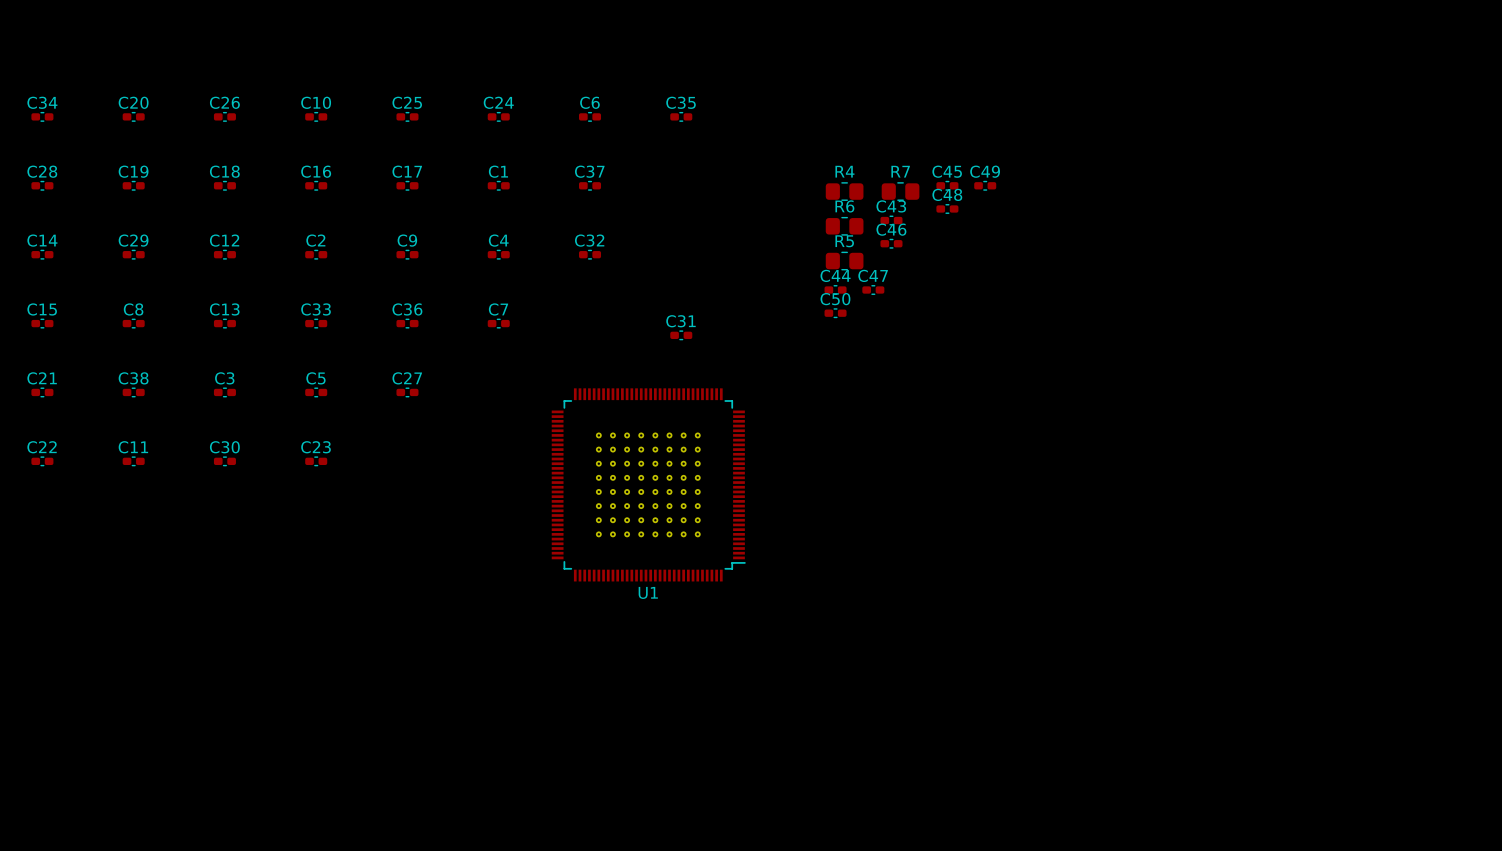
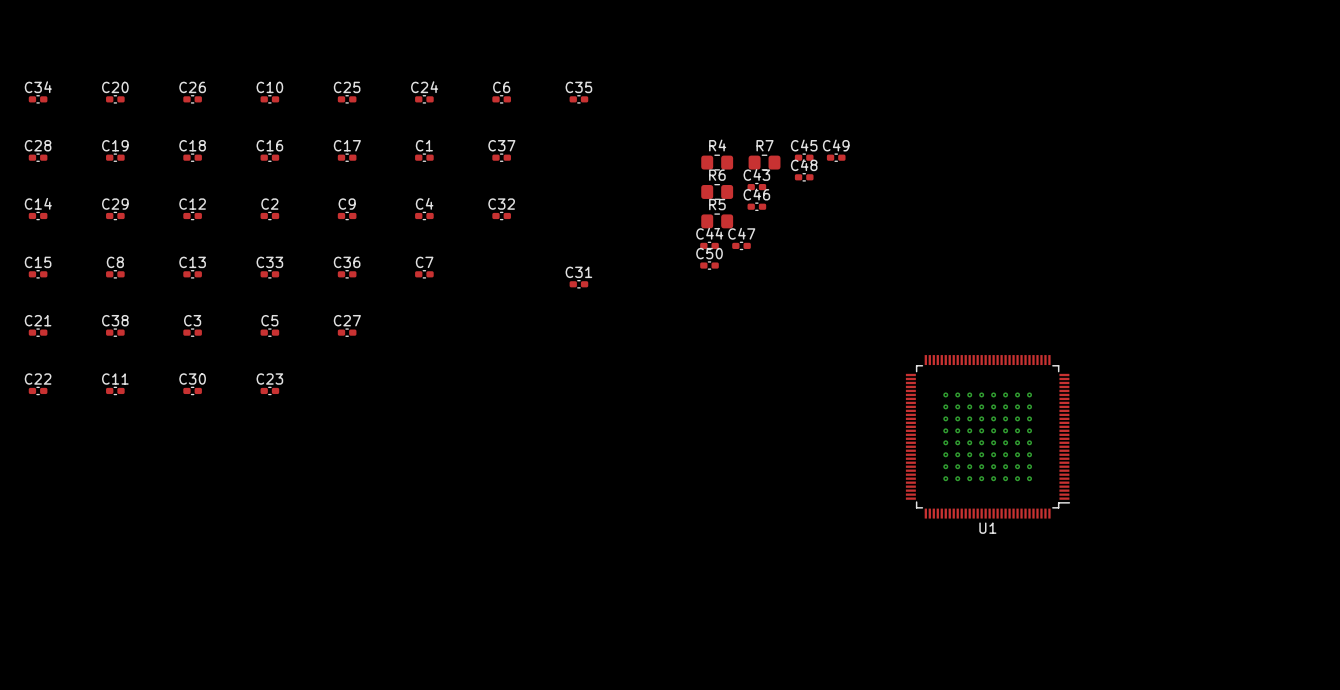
U1 position: (648, 484) -> (988, 436)

